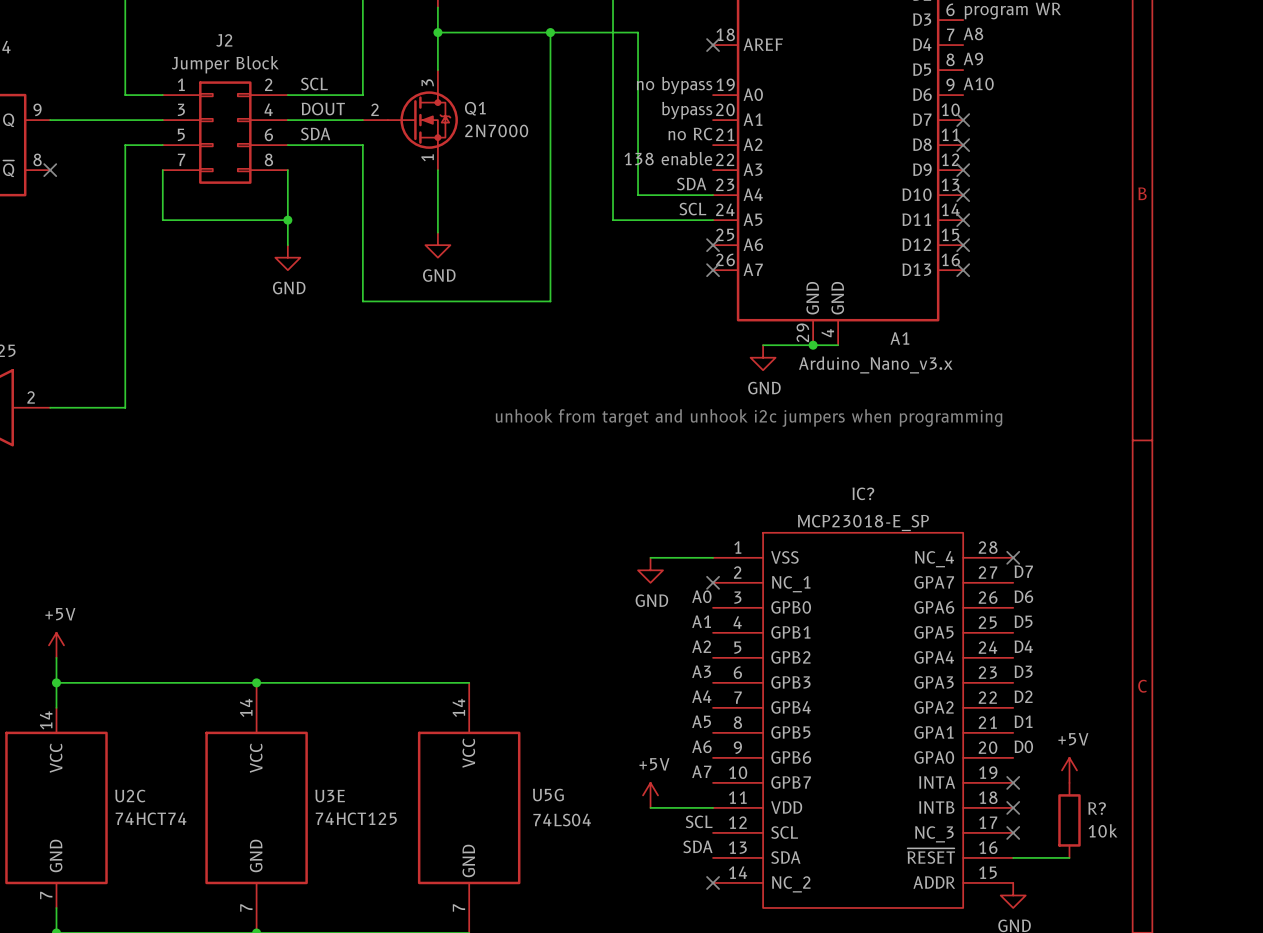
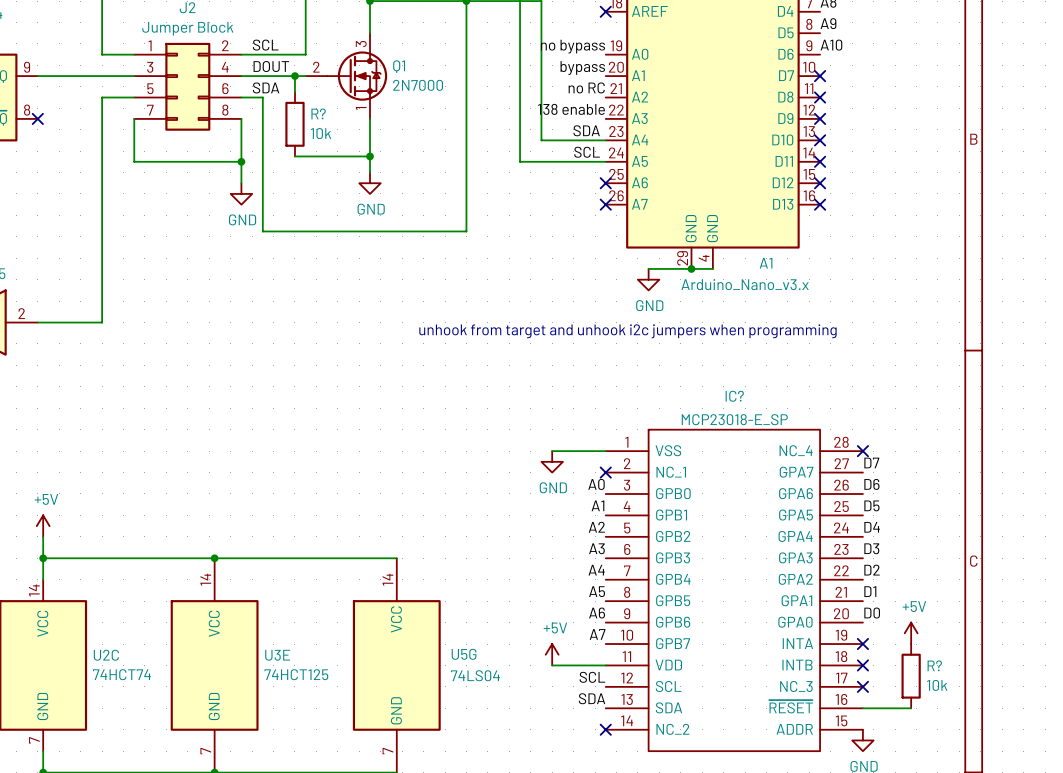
wire: none -> (294, 76) (294, 92)
junction: none -> (294, 76)
wire: (312, 145) (362, 145) (362, 301) -> (262, 97) (262, 231) (305, 231)
R?: none -> 10k (294, 124)
wire: none -> (294, 156) (370, 156)
junction: none -> (370, 156)

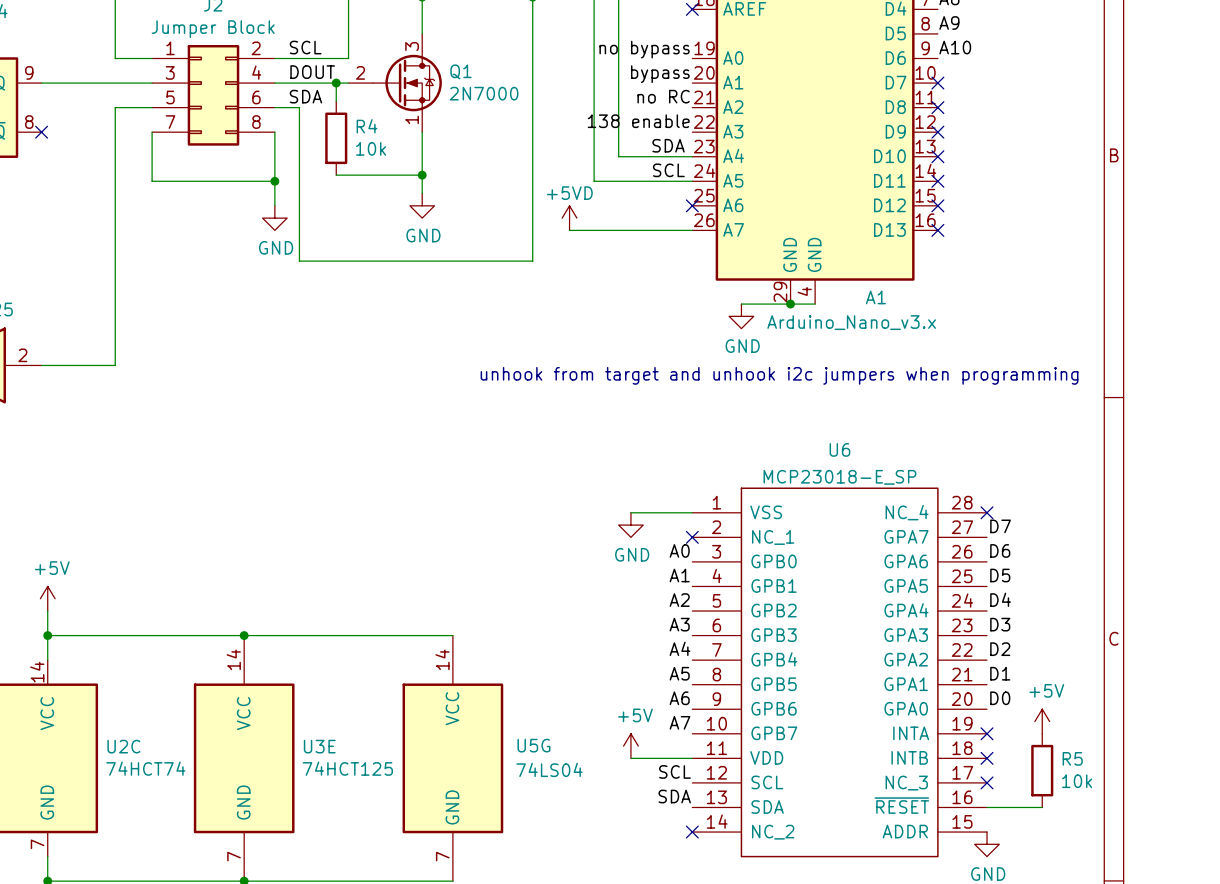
R? name: R? (318, 113) -> R4 (366, 126)
power symbol: none -> +5VD (569, 218)
wire: none -> (569, 230) (692, 230)
no-connect mark: (605, 204) -> none
IC? name: IC? (734, 396) -> U6 (839, 449)
R? name: R? (934, 665) -> R5 (1072, 758)

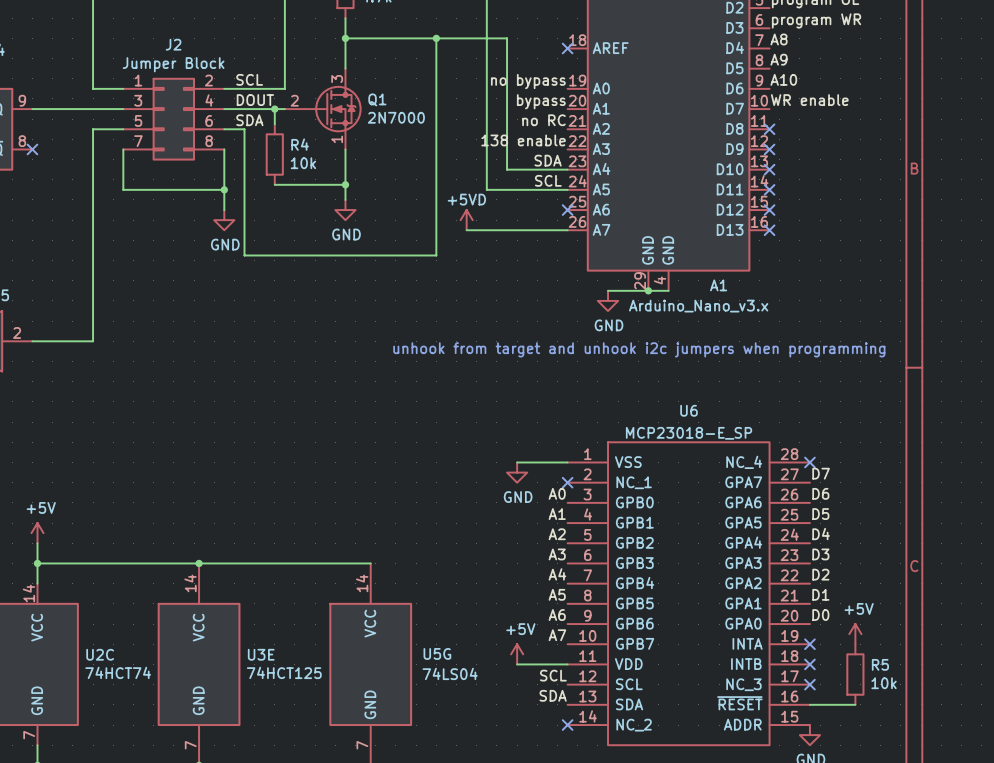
label: none -> WR enable (809, 100)
no-connect mark: (937, 83) -> none

